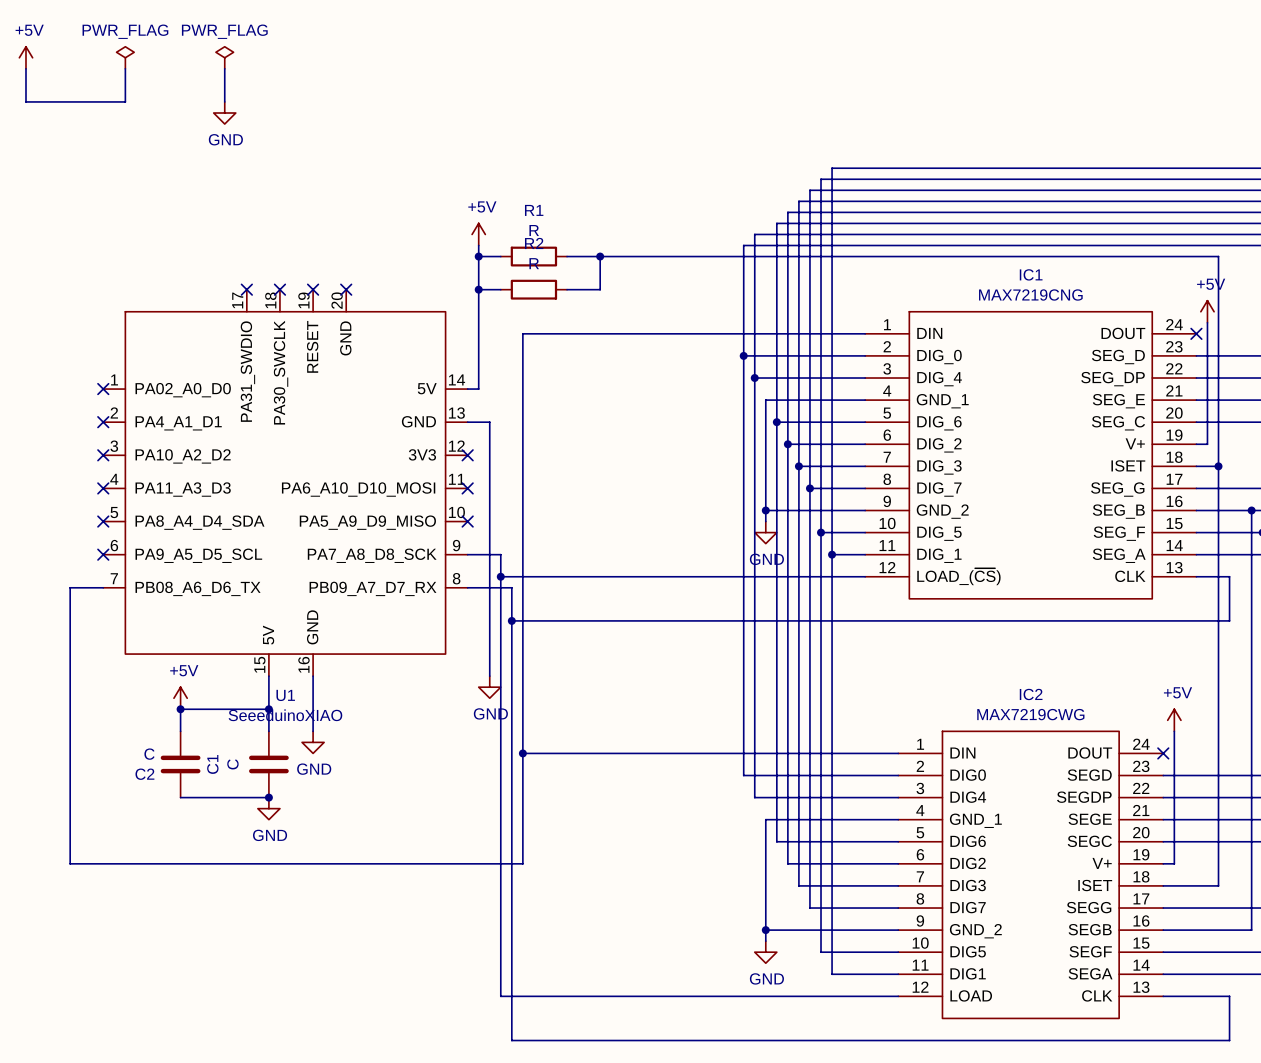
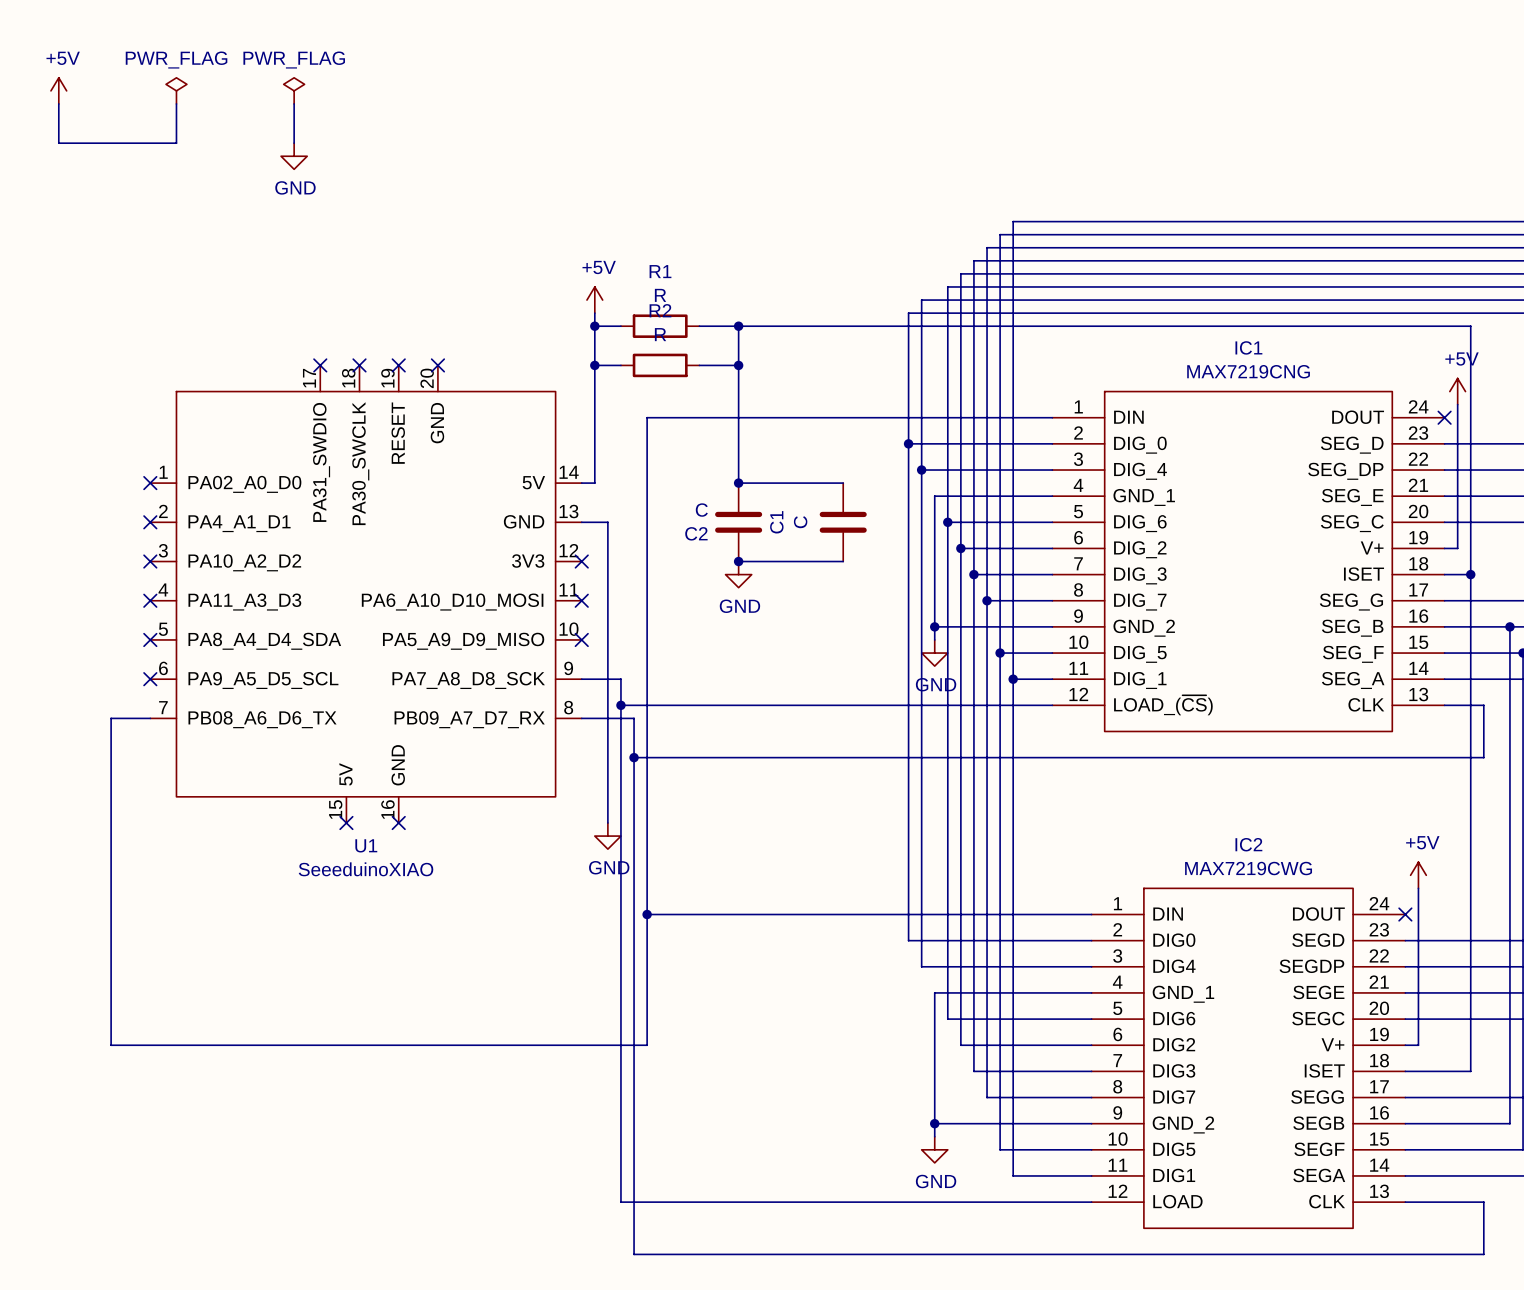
wire: none -> (738, 365) (738, 483) (843, 483)
junction: none -> (738, 365)
junction: none -> (738, 483)
wire: none -> (738, 561) (843, 561)
junction: none -> (738, 561)
power symbol: none -> GND (738, 574)
wire: (268, 676) (268, 731) -> none
no-connect mark: none -> (346, 822)
wire: (313, 676) (313, 731) -> none
no-connect mark: none -> (398, 822)
power symbol: +5V (180, 698) -> none
junction: (180, 709) -> none
wire: (268, 709) (180, 709) (180, 731) -> none
junction: (268, 709) -> none
power symbol: GND (313, 742) -> none
C2 position: (180, 764) -> (738, 522)
C1 position: (268, 764) -> (843, 522)
wire: (180, 797) (268, 797) -> none
junction: (268, 797) -> none
power symbol: GND (268, 808) -> none

